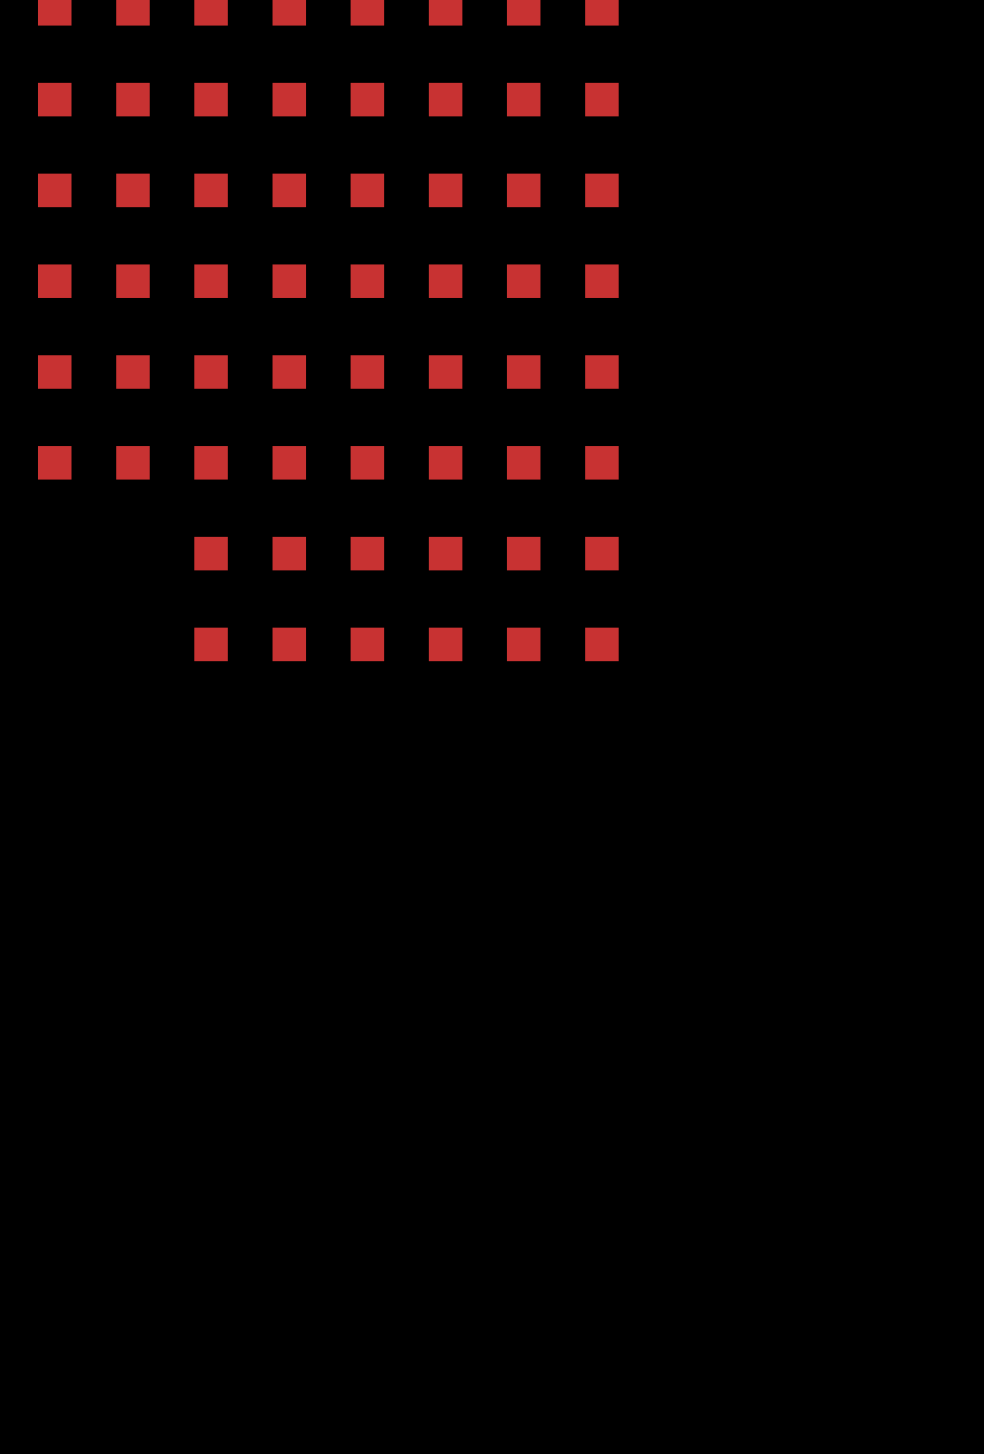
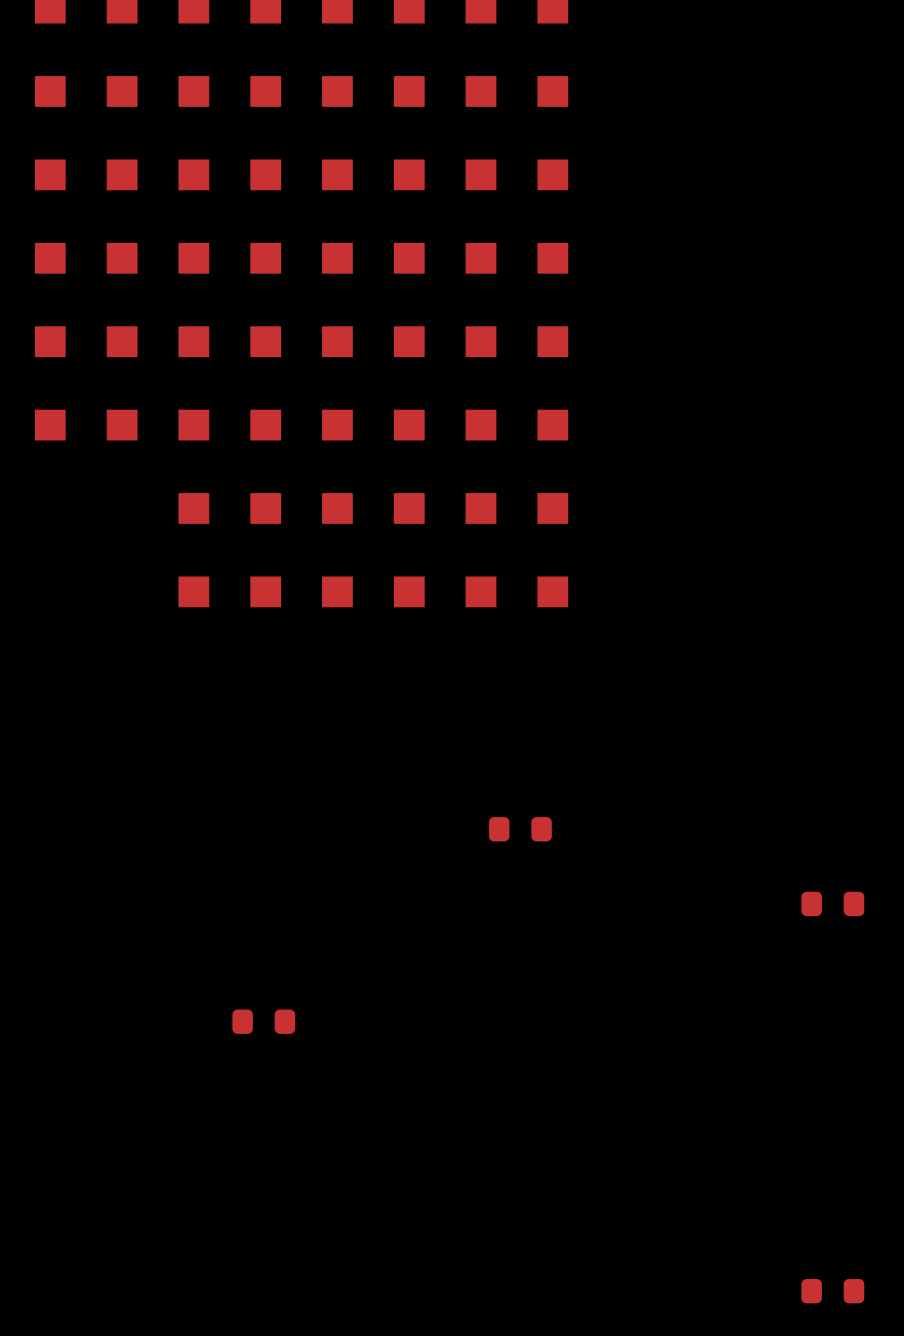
part: none -> (520, 829)
part: none -> (832, 903)
part: none -> (263, 1021)
part: none -> (832, 1291)

